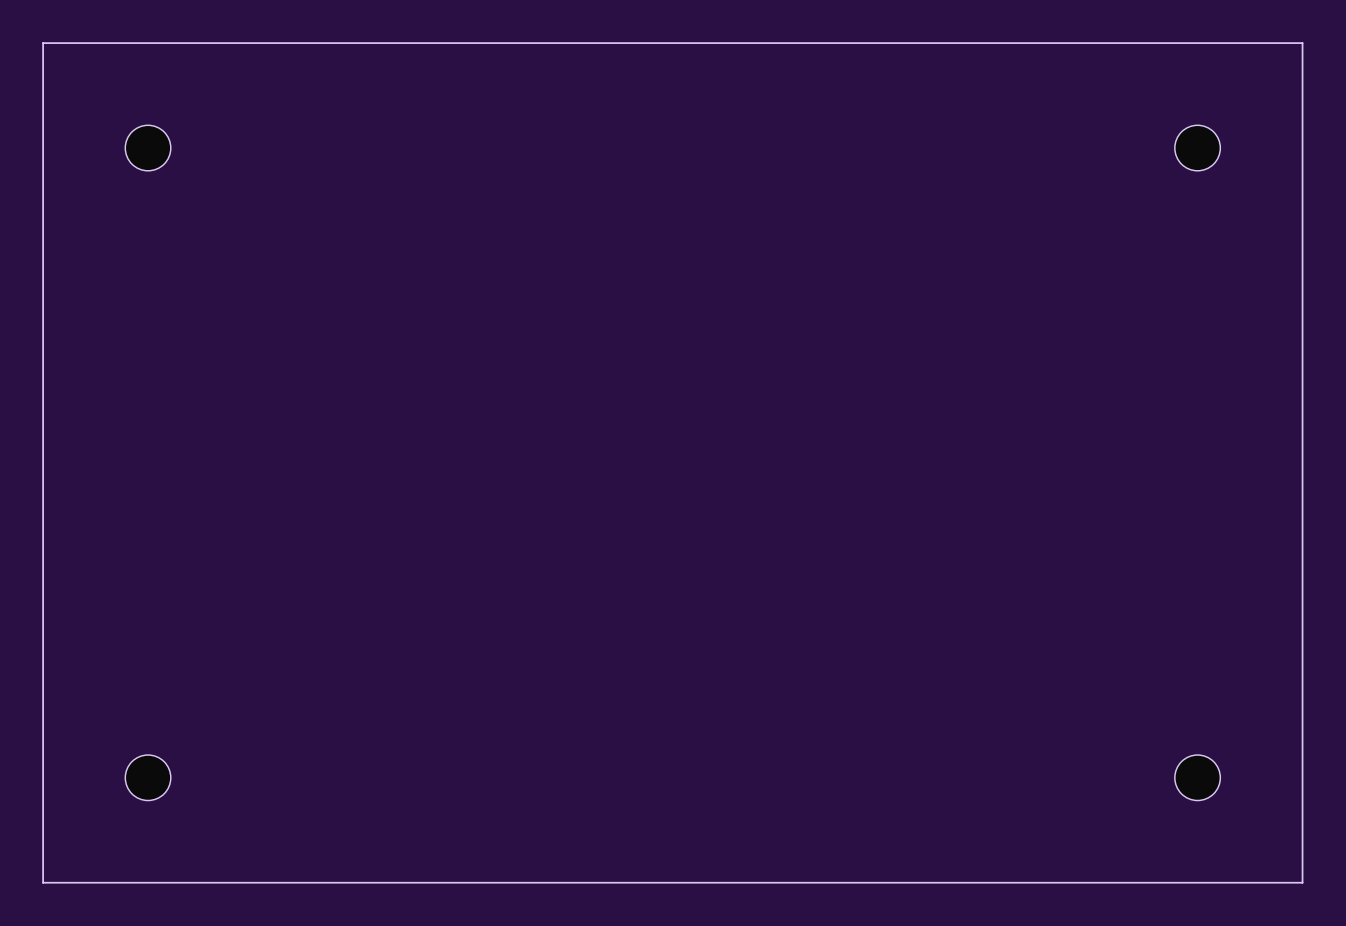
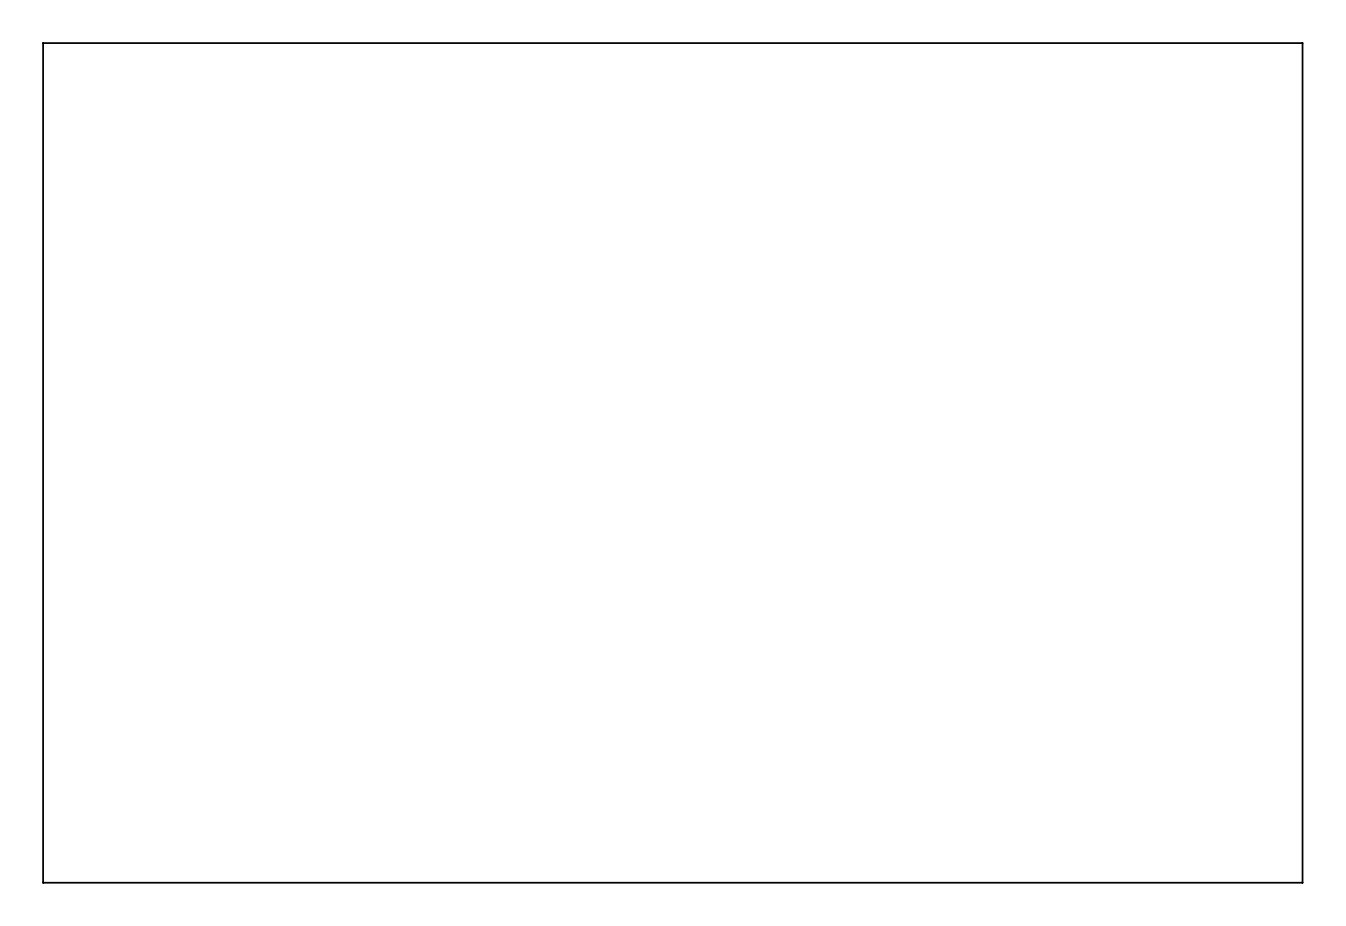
part: (148, 148) -> none
part: (1197, 148) -> none
part: (148, 777) -> none
part: (1197, 777) -> none

